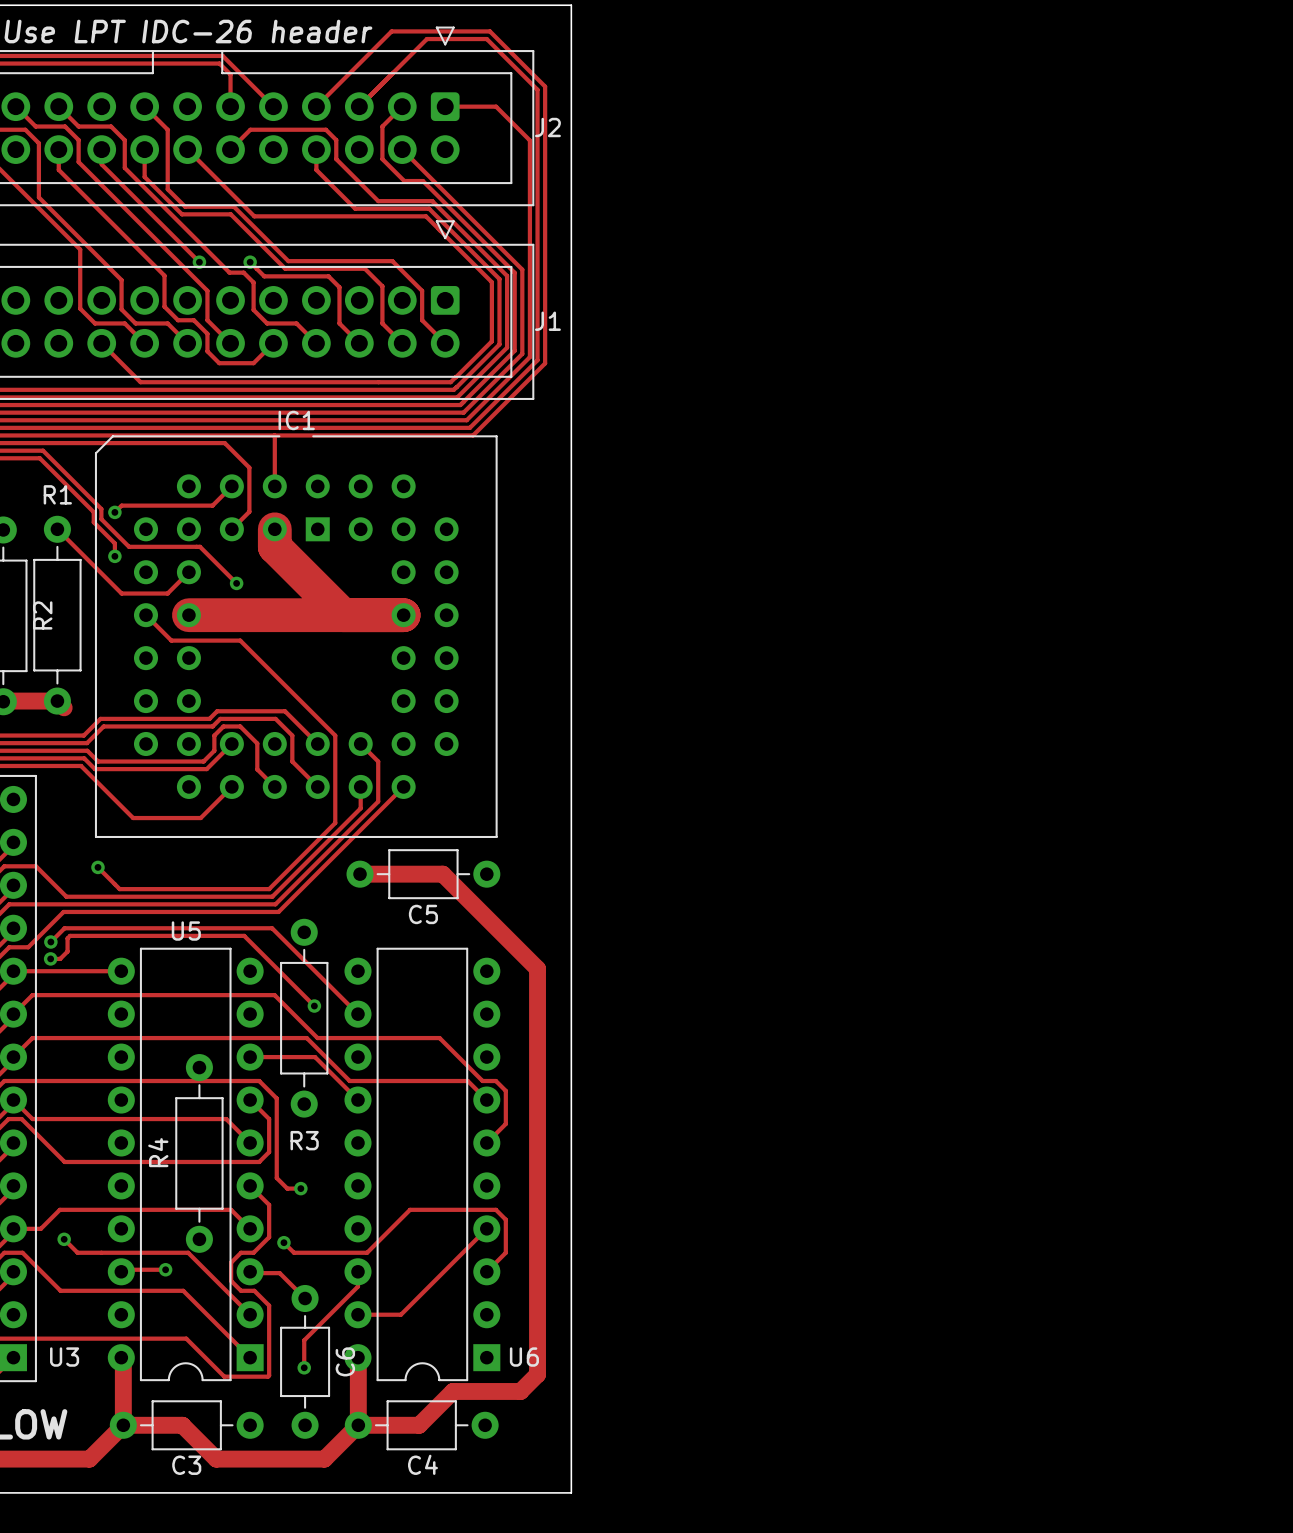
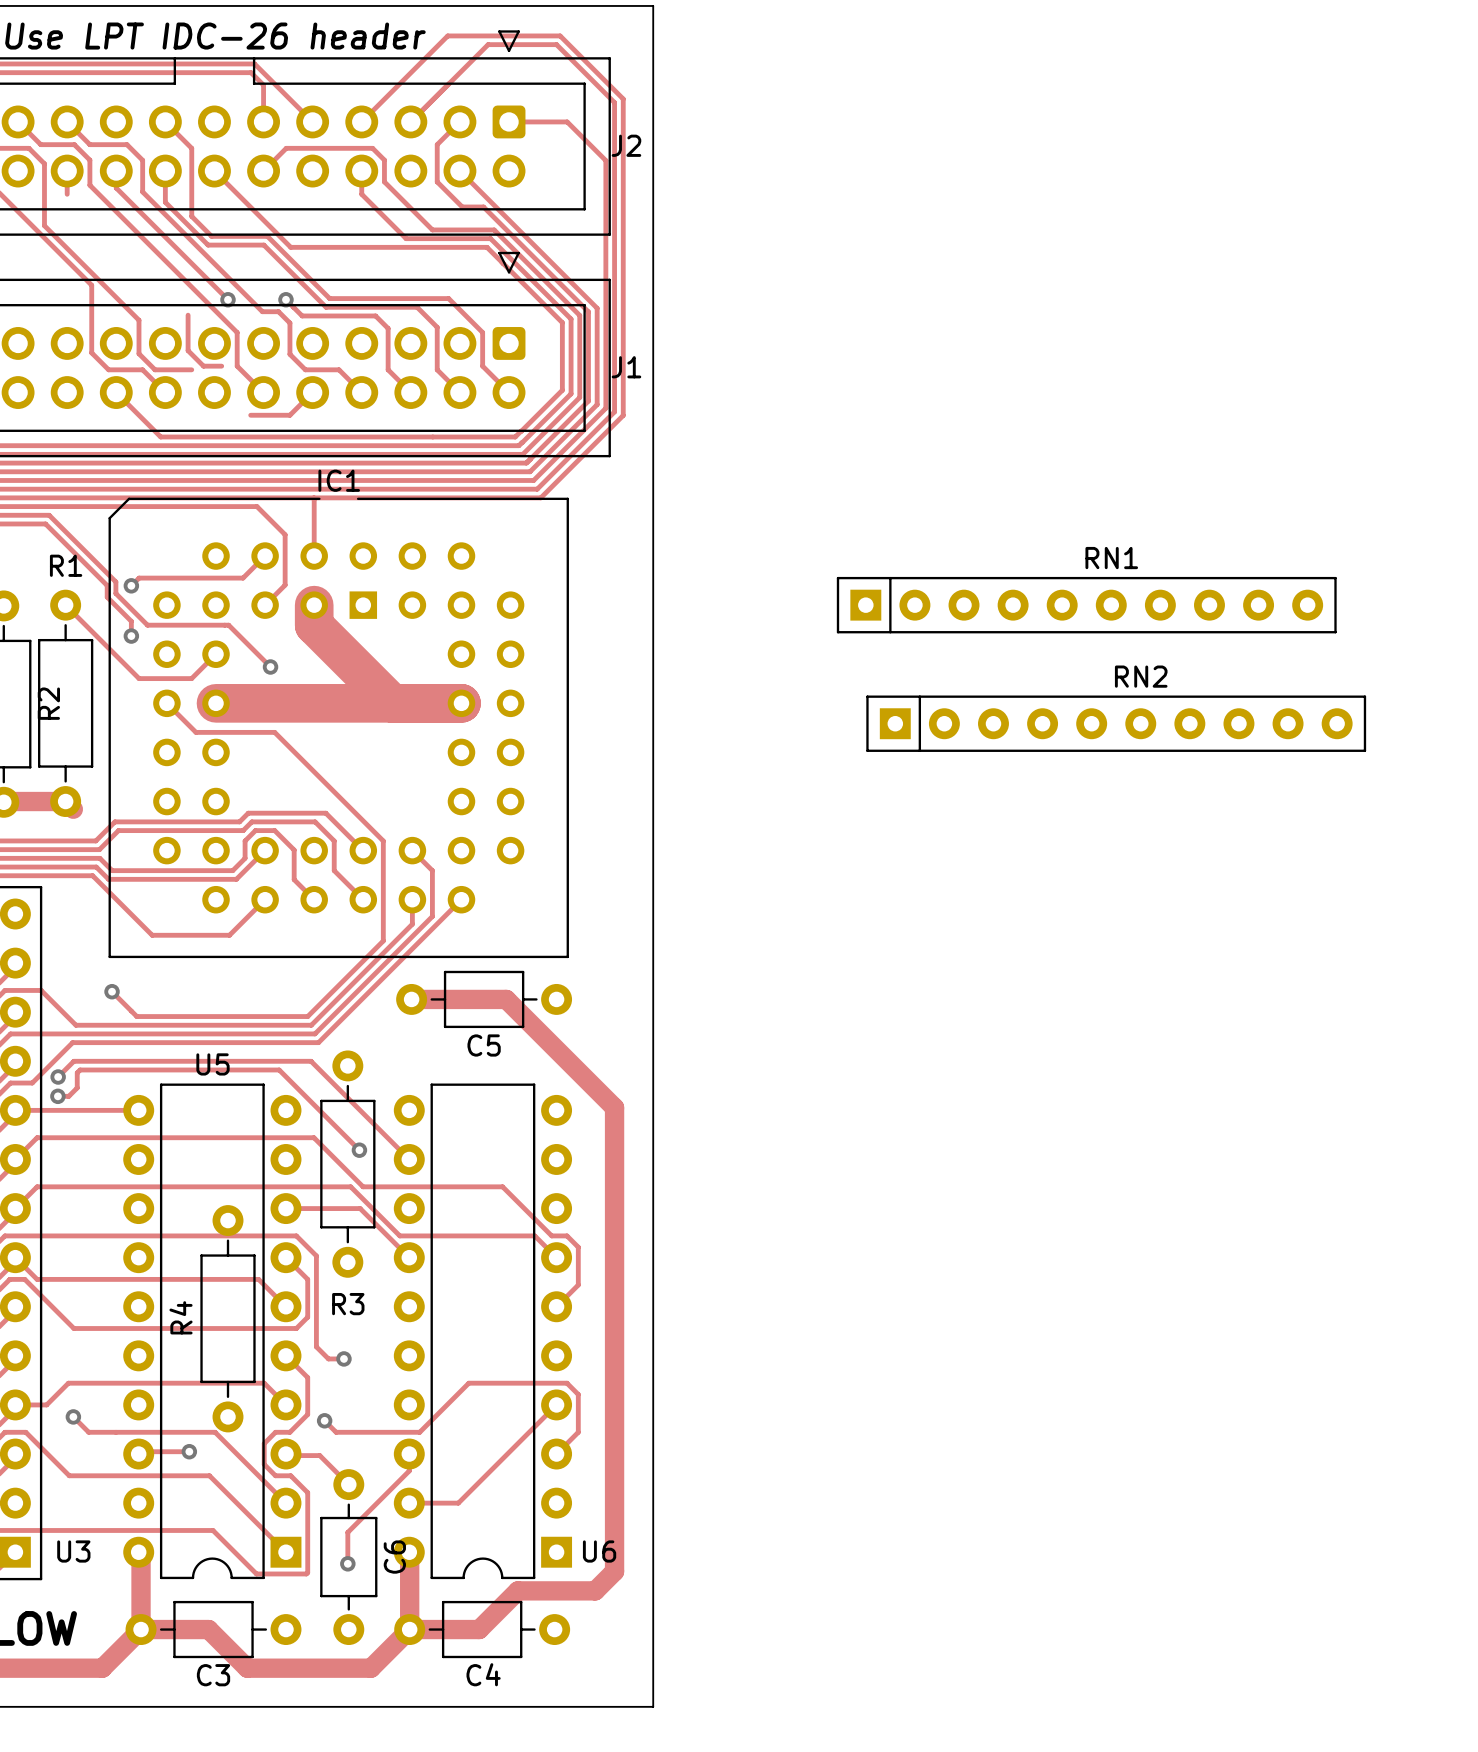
track: (58, 169) (164, 275) -> none
track: (193, 320) (207, 333) (207, 351) (219, 363) -> none
track: (167, 323) (187, 343) -> none
RN1: none -> (1086, 605)
RN2: none -> (1116, 723)

